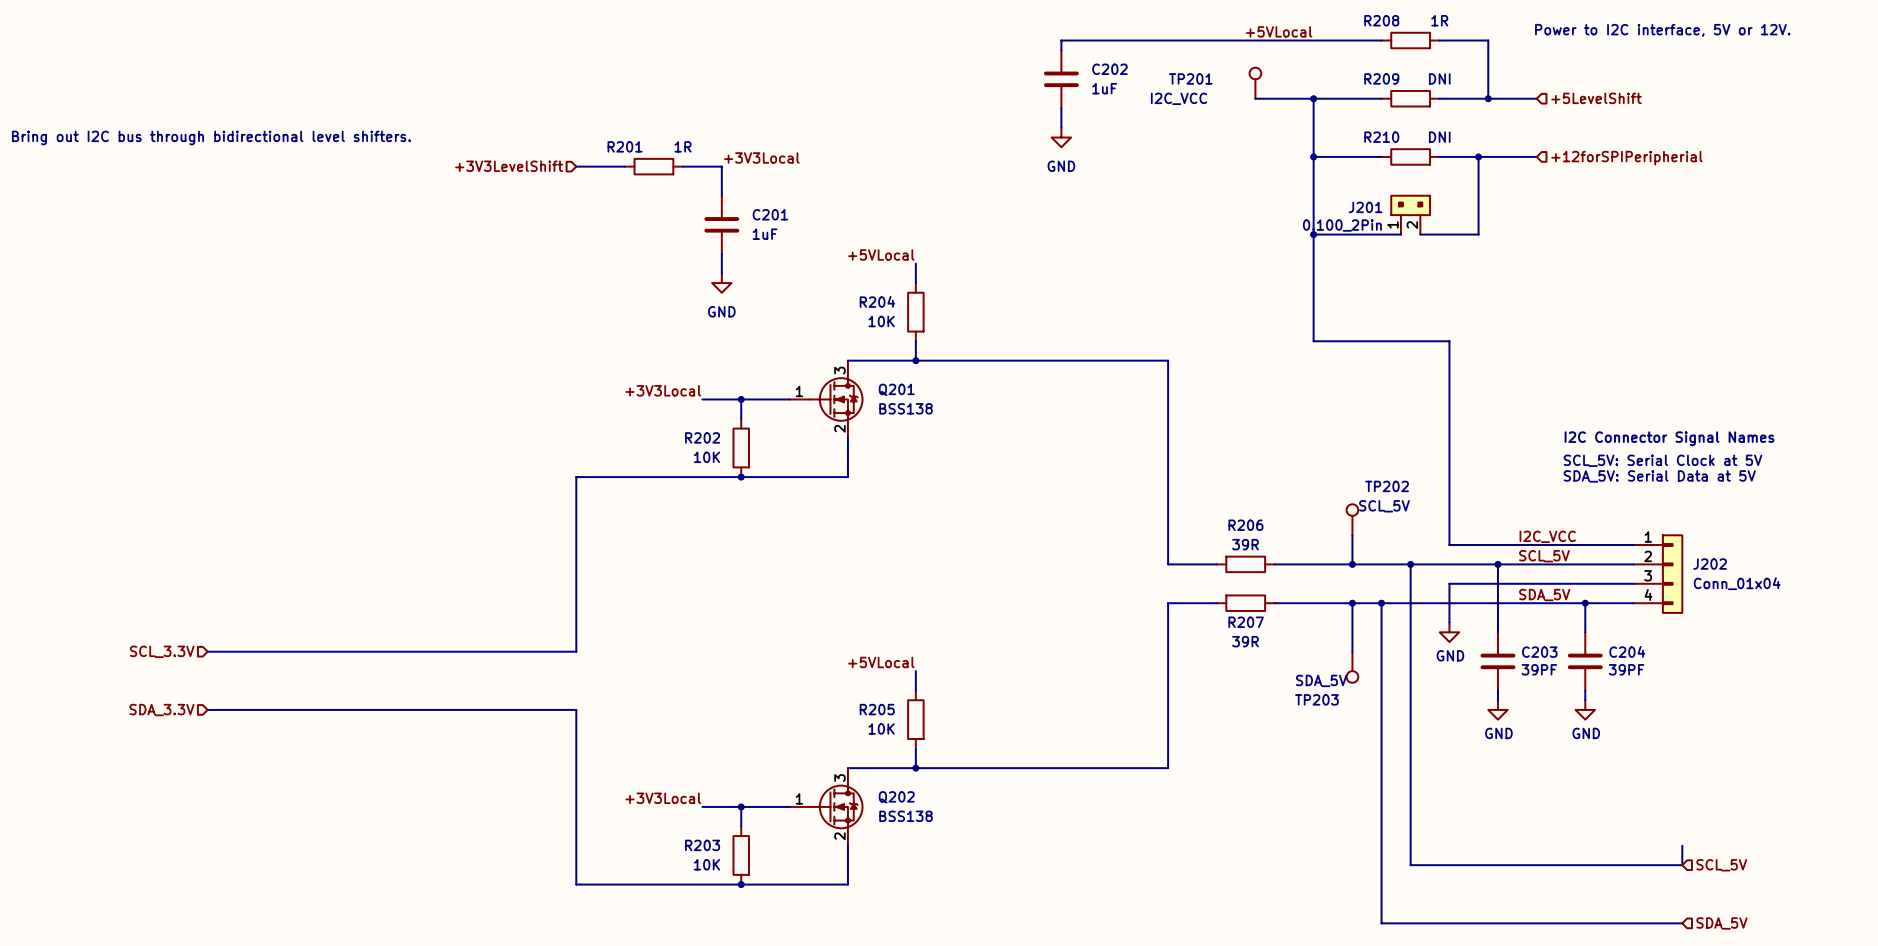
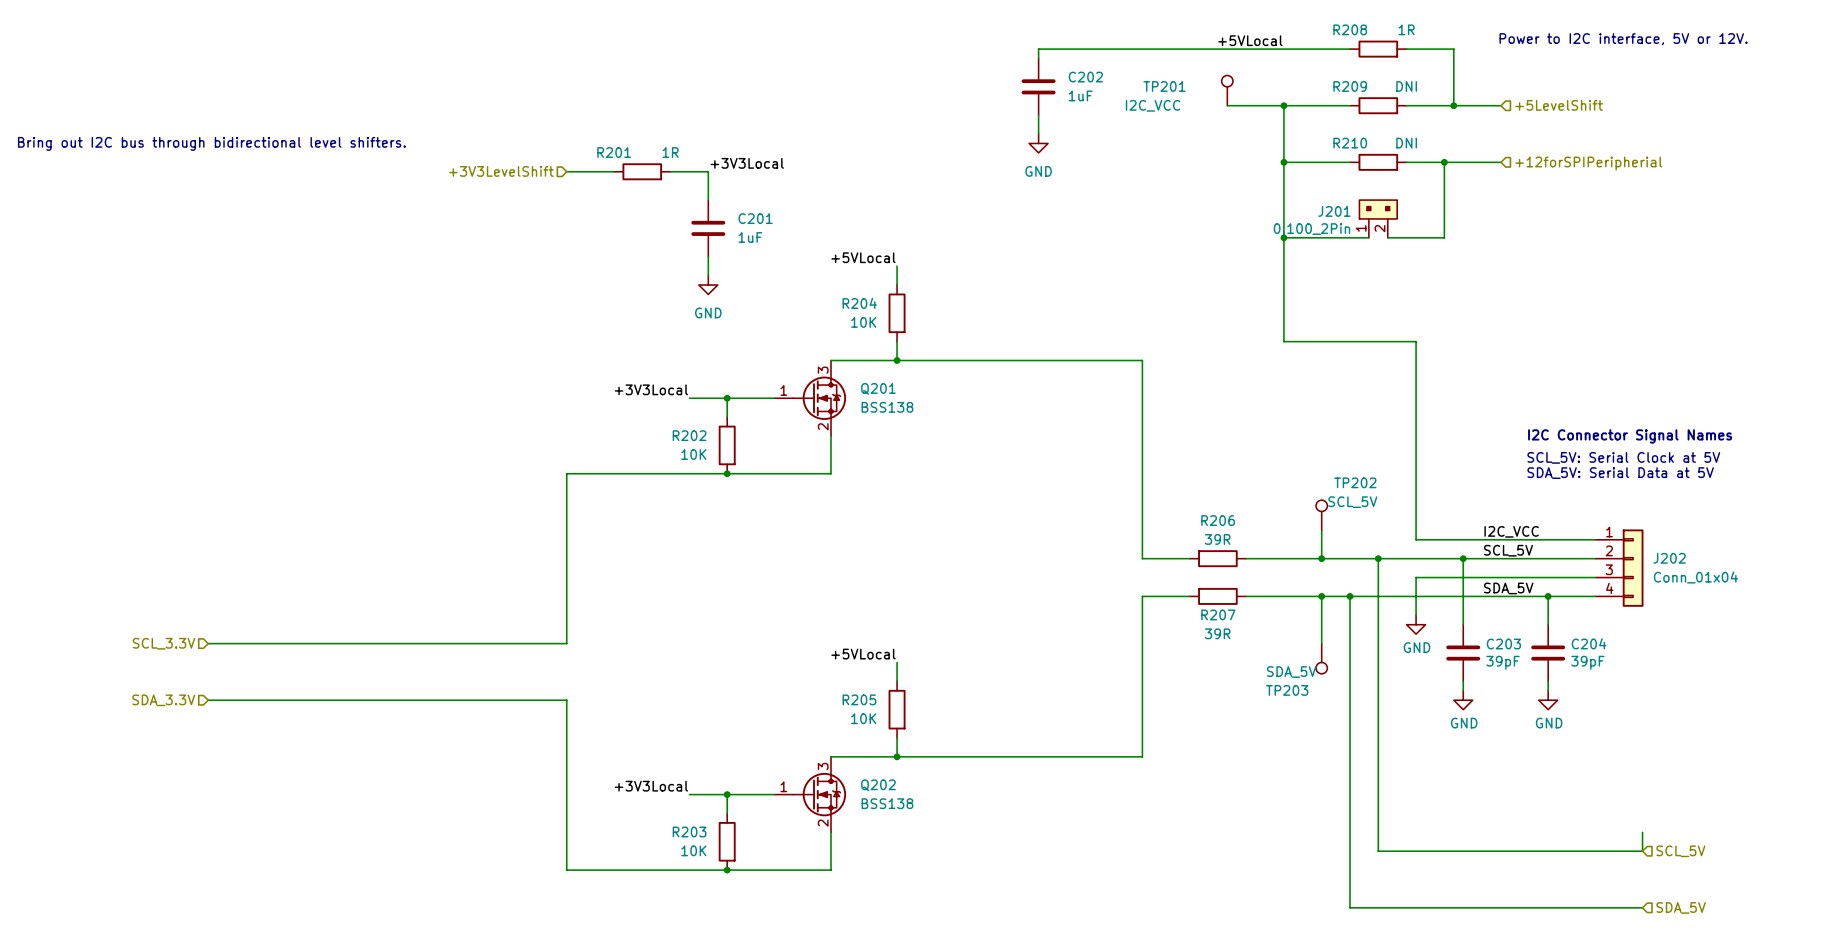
C203 value: 39PF (1539, 669) -> 39pF (1503, 662)
C204 value: 39PF (1626, 669) -> 39pF (1587, 662)

